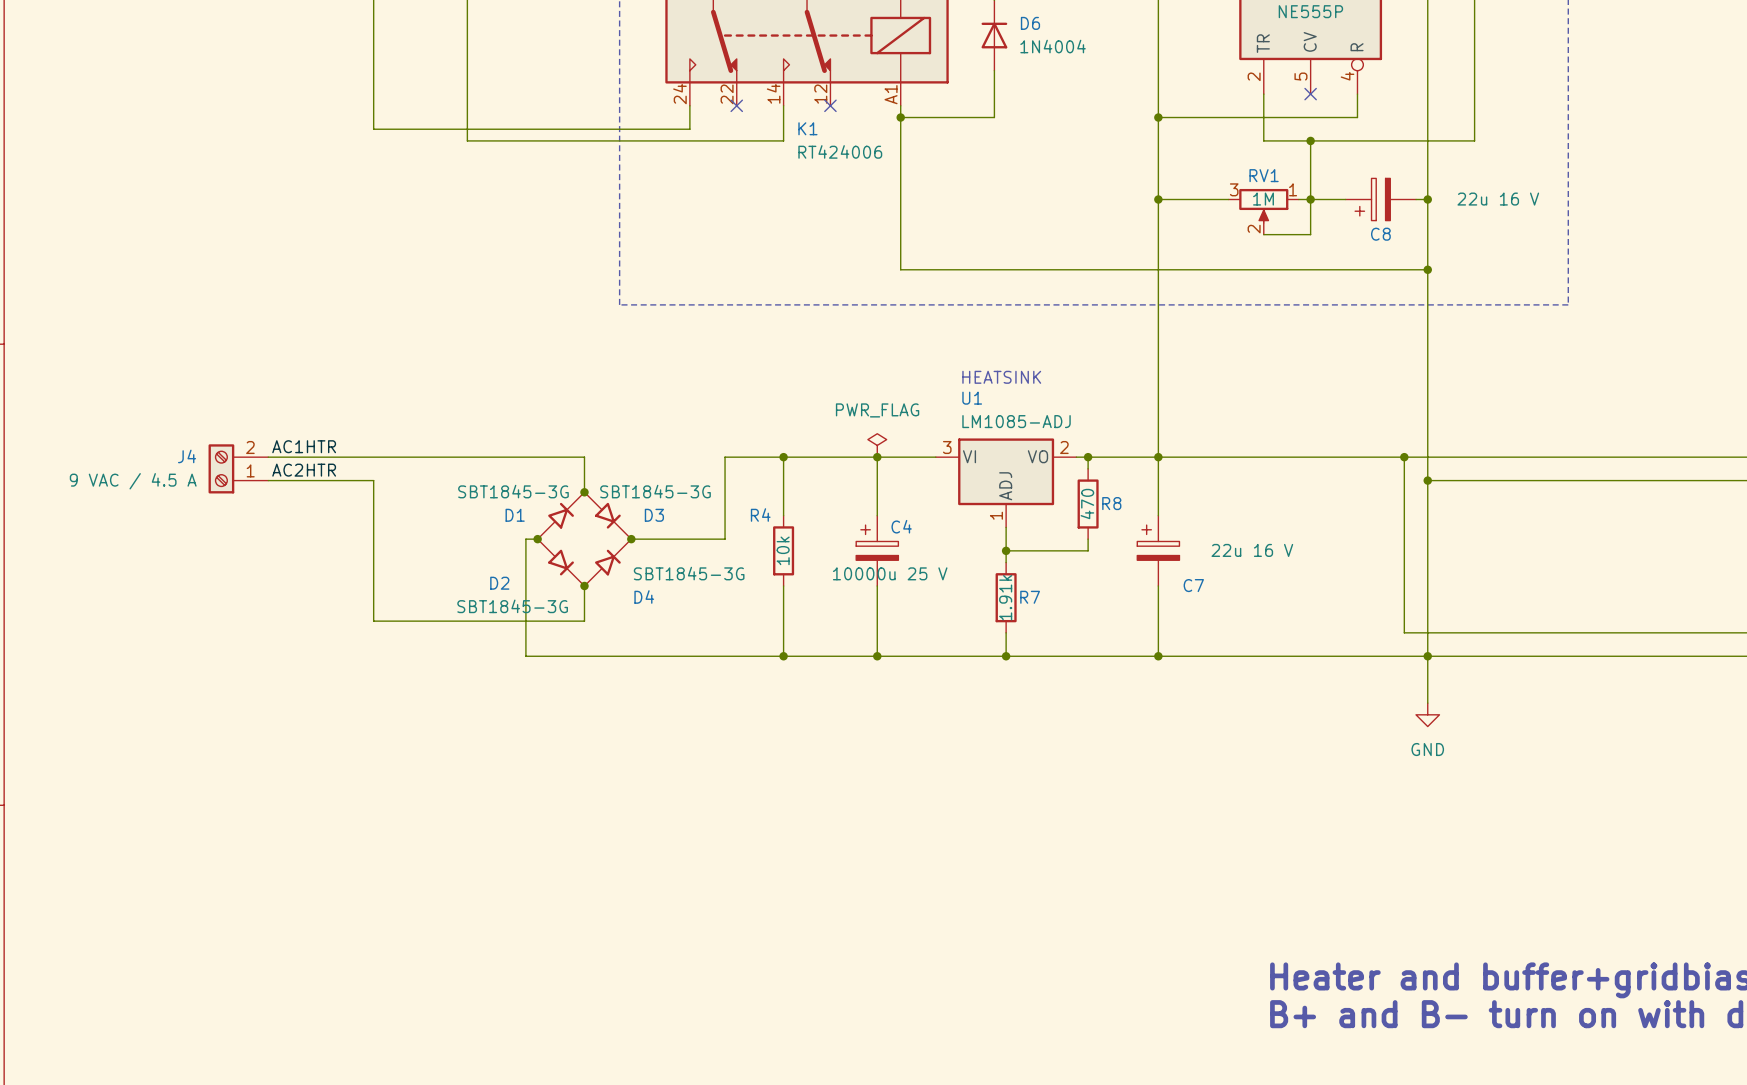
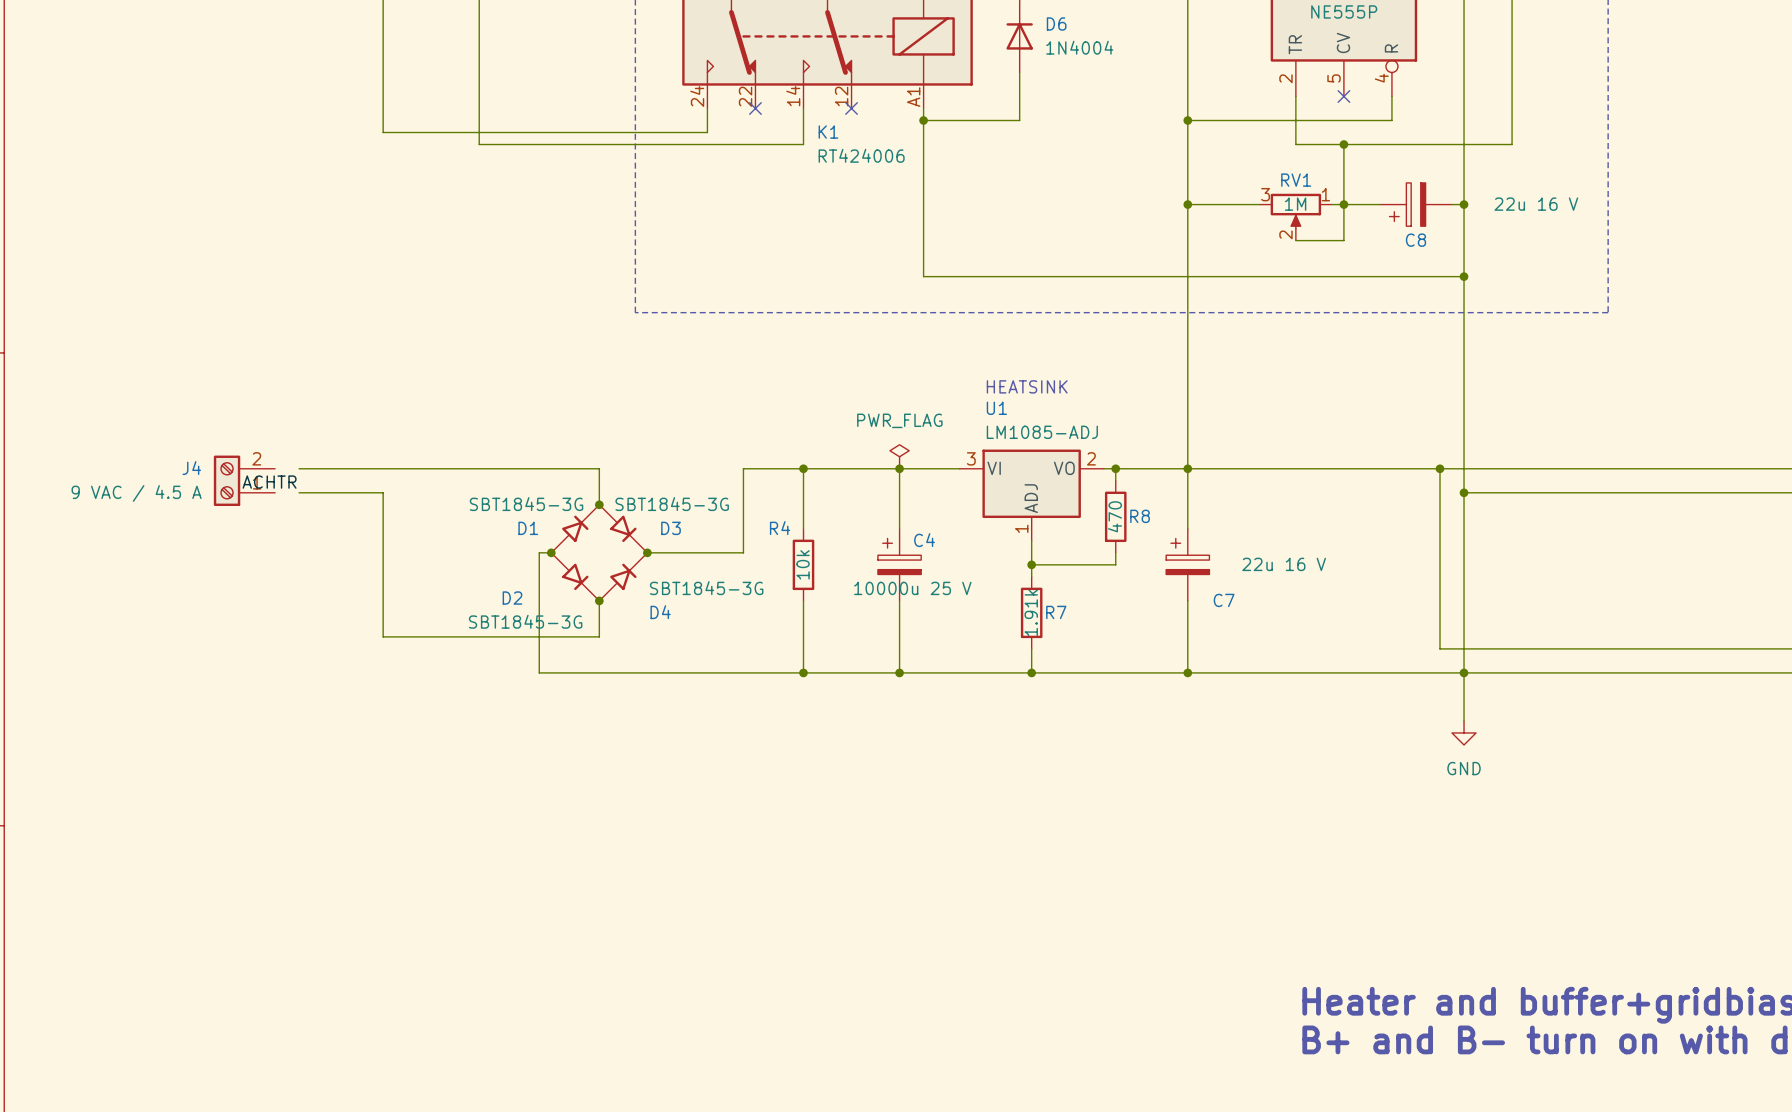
label: AC1HTR (304, 446) -> none
wire: (268, 457) (291, 457) -> none
label: none -> ACHTR (269, 482)
label: AC2HTR (304, 470) -> none
wire: (268, 480) (291, 480) -> none

